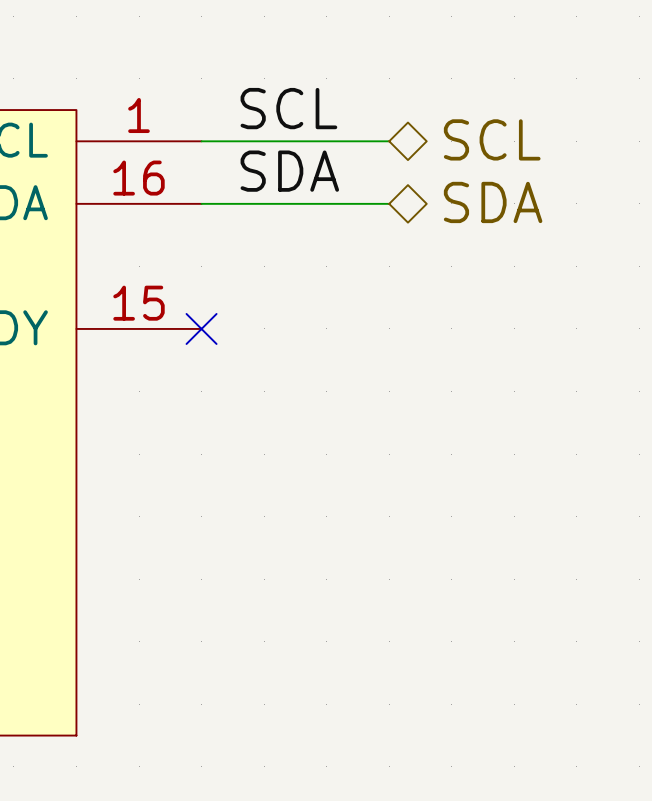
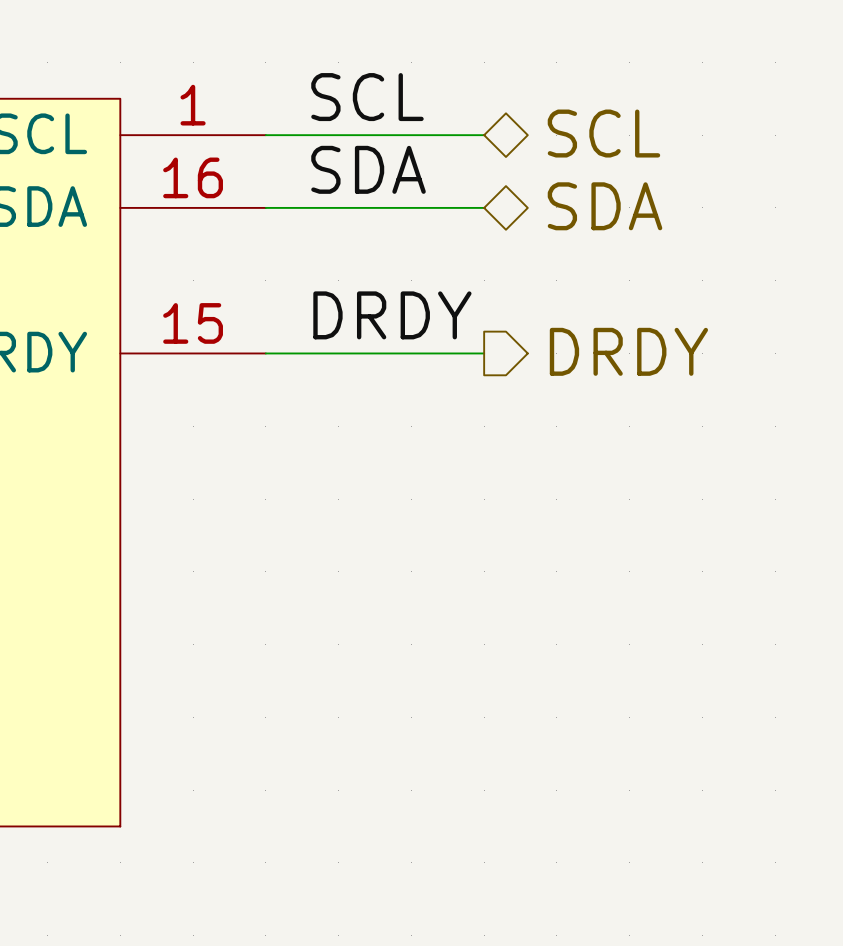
label: none -> DRDY (392, 315)
hierarchical label: none -> DRDY (628, 351)
wire: none -> (265, 353) (484, 353)
no-connect mark: (201, 328) -> none

